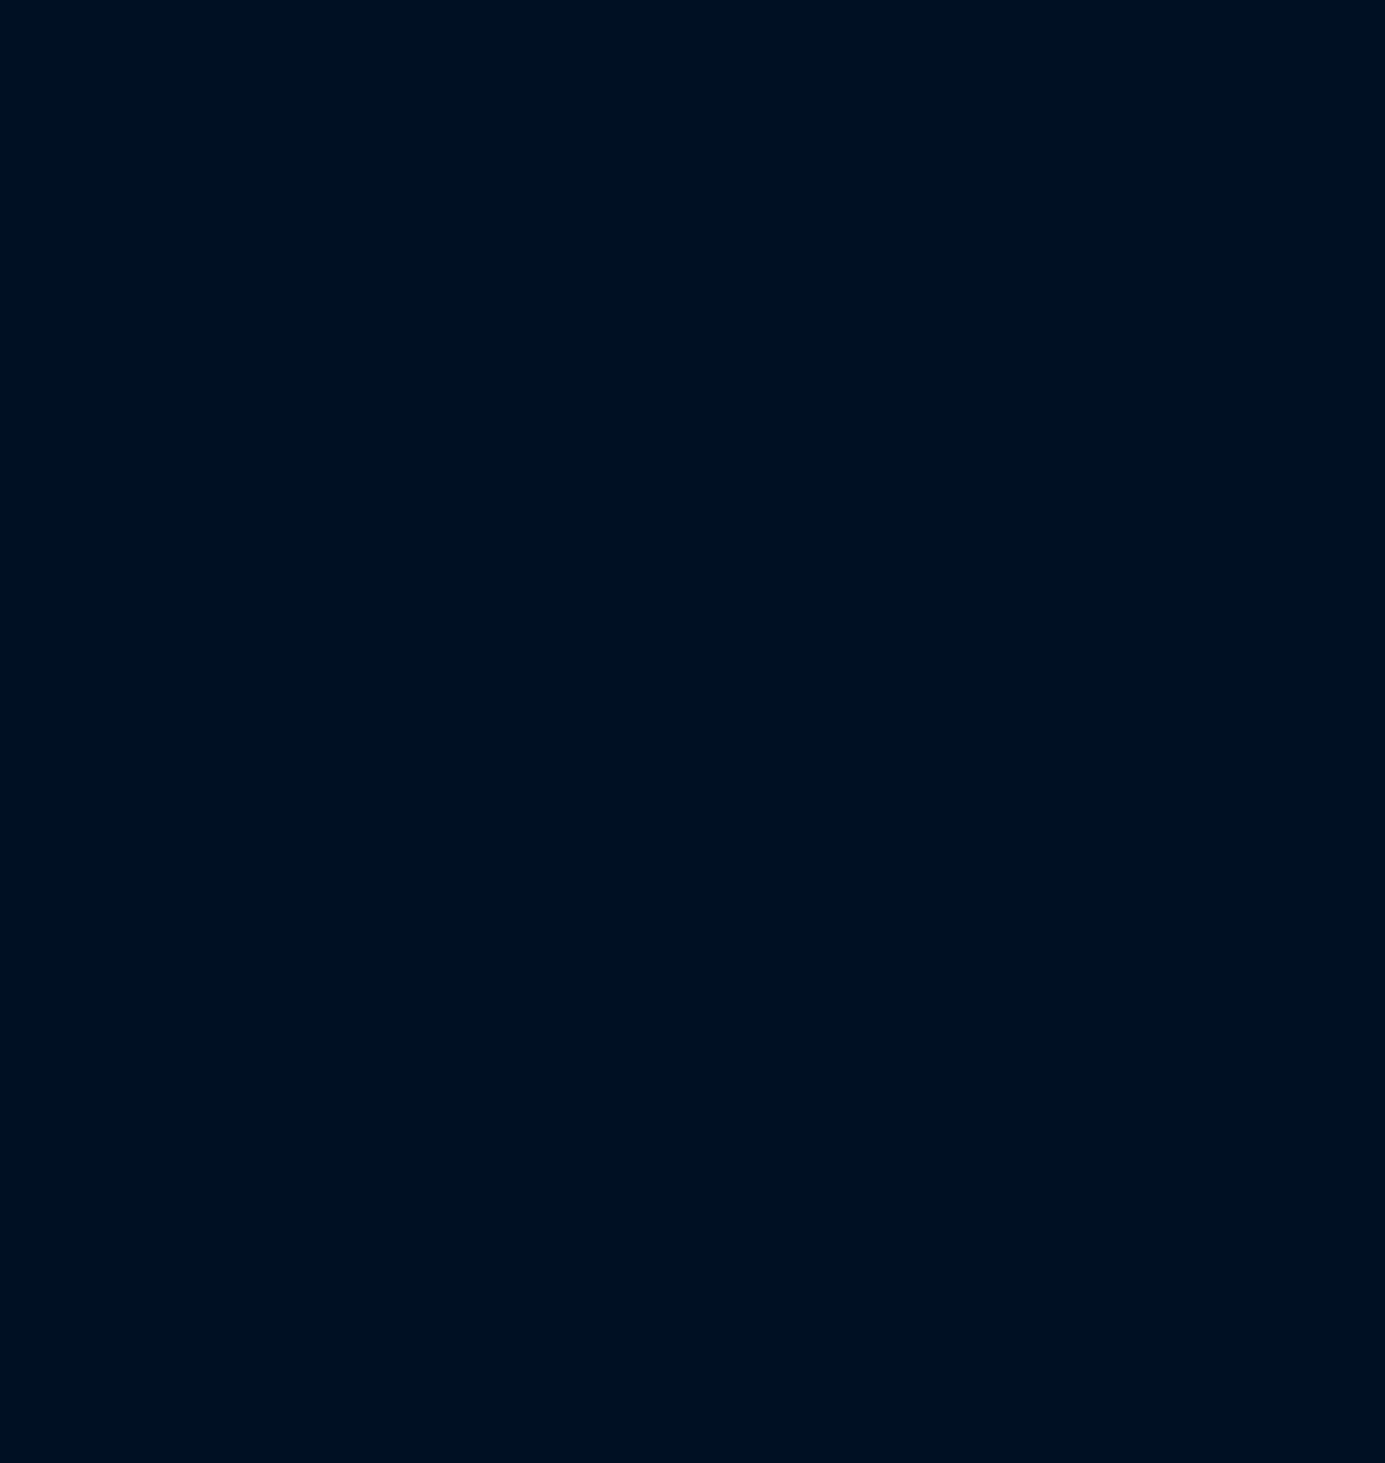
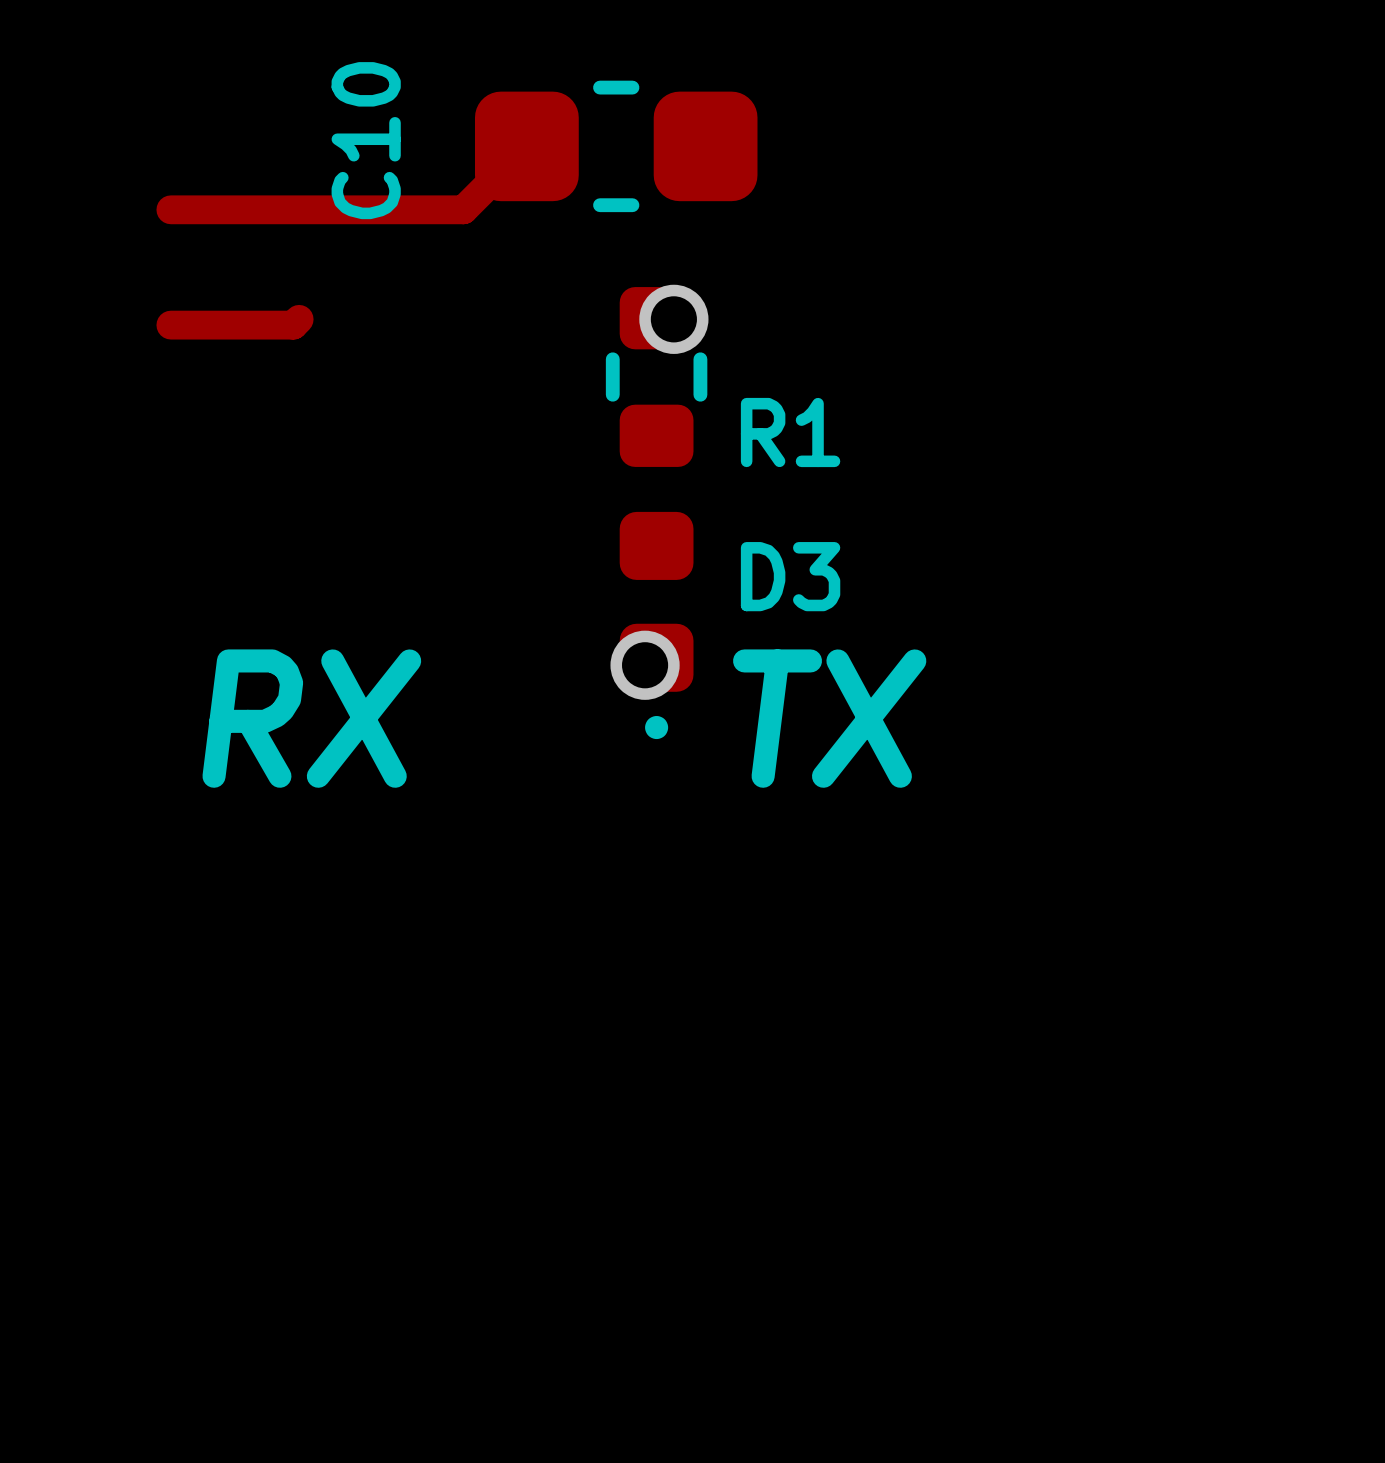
track: none -> (526, 146) (463, 209) (170, 209)
C10: none -> (616, 146)
track: none -> (299, 319) (293, 325) (170, 325)
via: none -> (673, 319)
R1: none -> (656, 377)
D3: none -> (656, 625)
via: none -> (645, 665)
text: none -> RX (311, 718)
text: none -> TX (829, 718)

